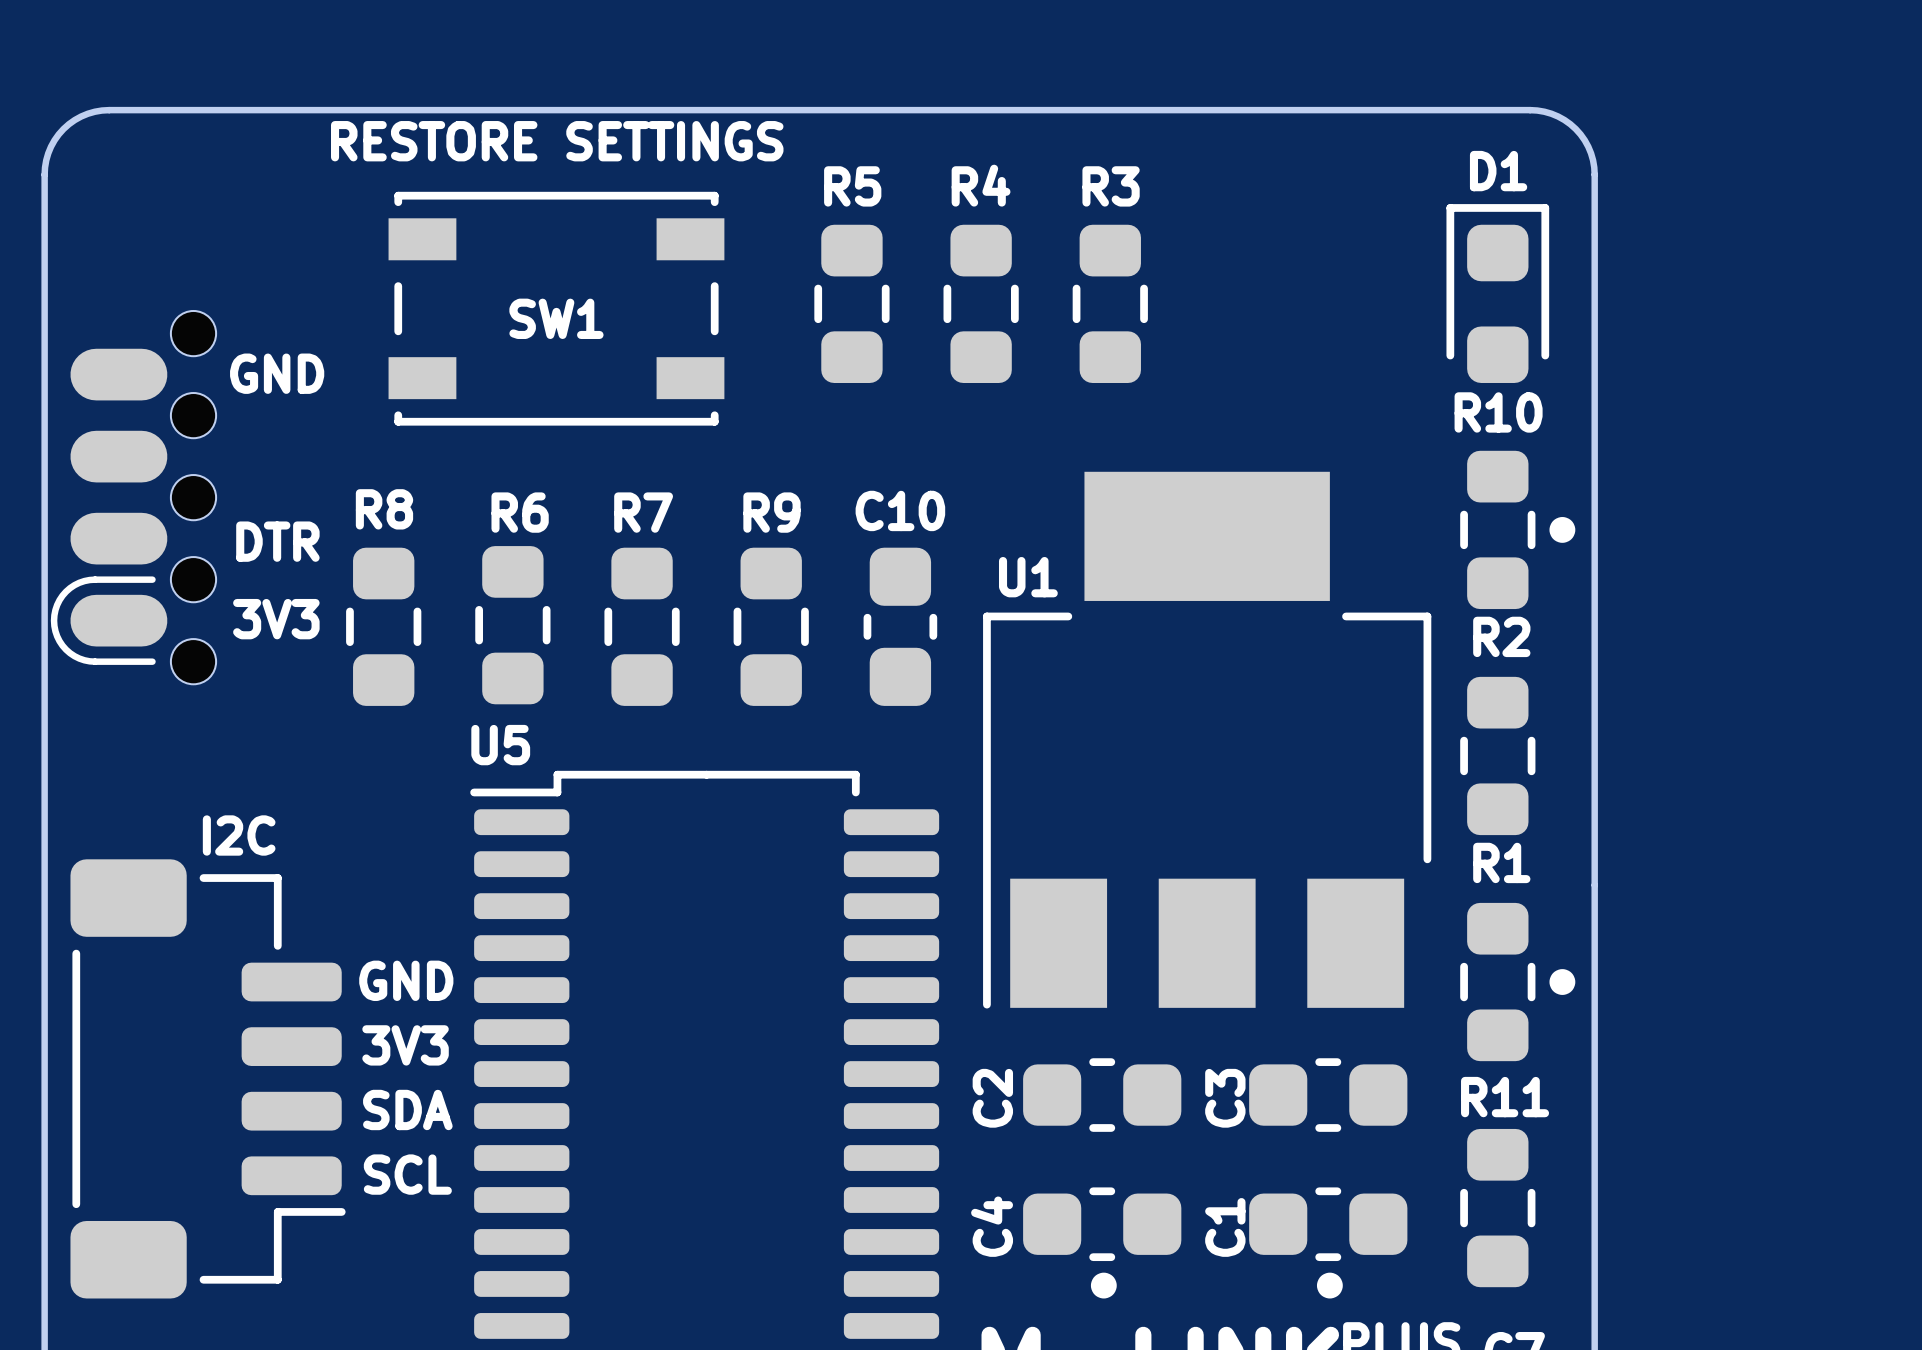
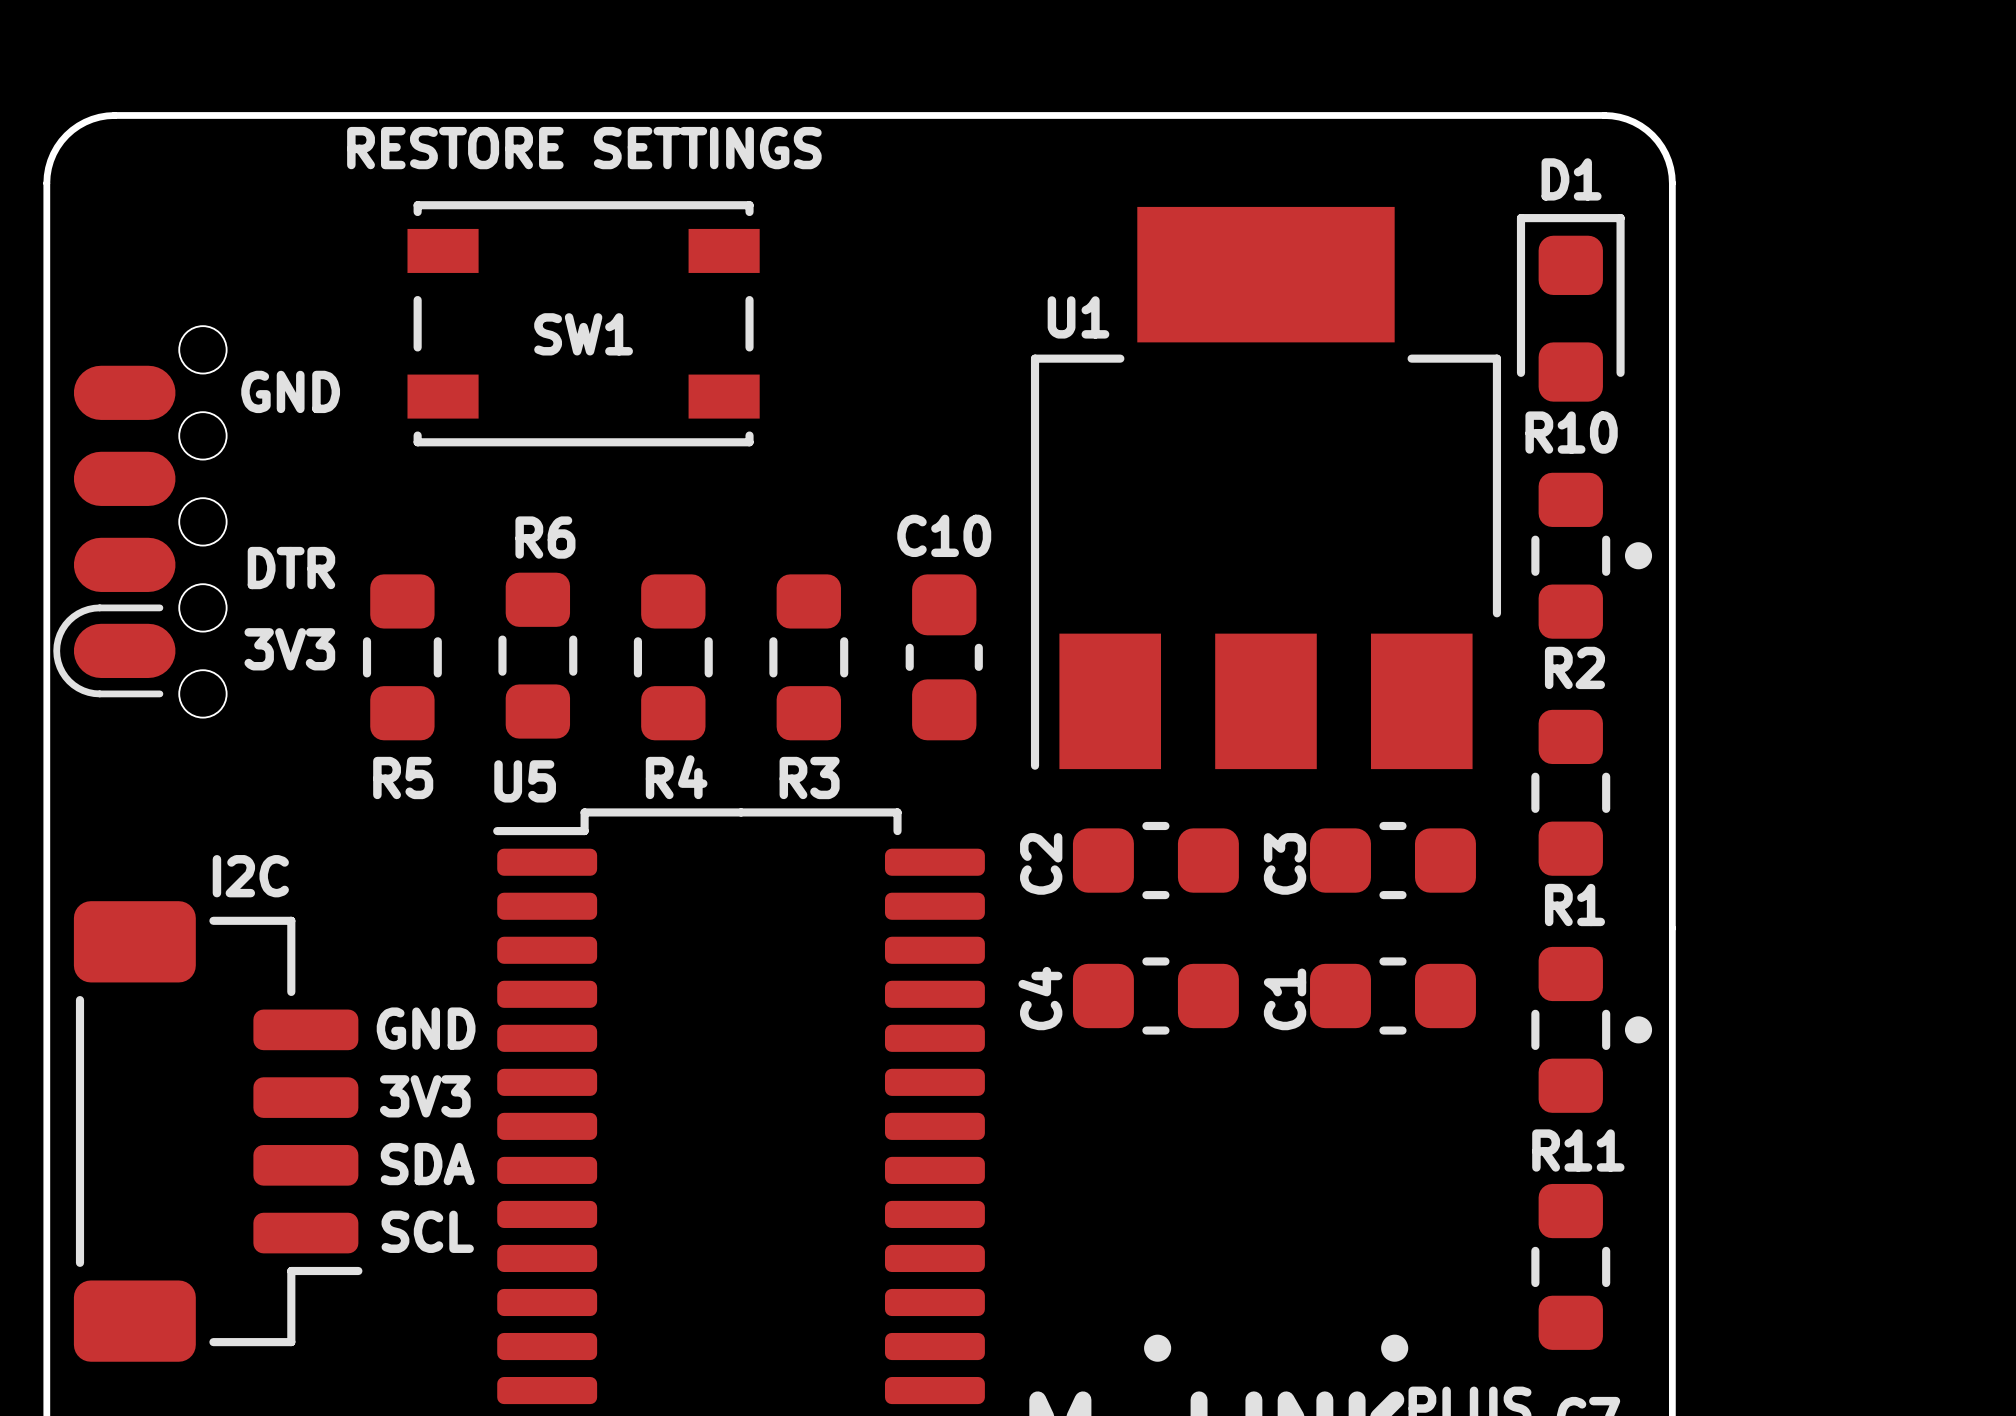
R5: (851, 303) -> none
R4: (981, 303) -> none
R3: (1110, 303) -> none
R8 name: R8 (384, 509) -> R5 (403, 777)
R7 name: R7 (643, 512) -> R4 (676, 777)
R9 name: R9 (771, 512) -> R3 (809, 777)
U1 position: (1207, 740) -> (1265, 488)
C2 position: (1102, 1095) -> (1155, 860)
C3 position: (1328, 1095) -> (1392, 860)
C4 position: (1102, 1224) -> (1155, 996)
C1 position: (1328, 1224) -> (1392, 996)

